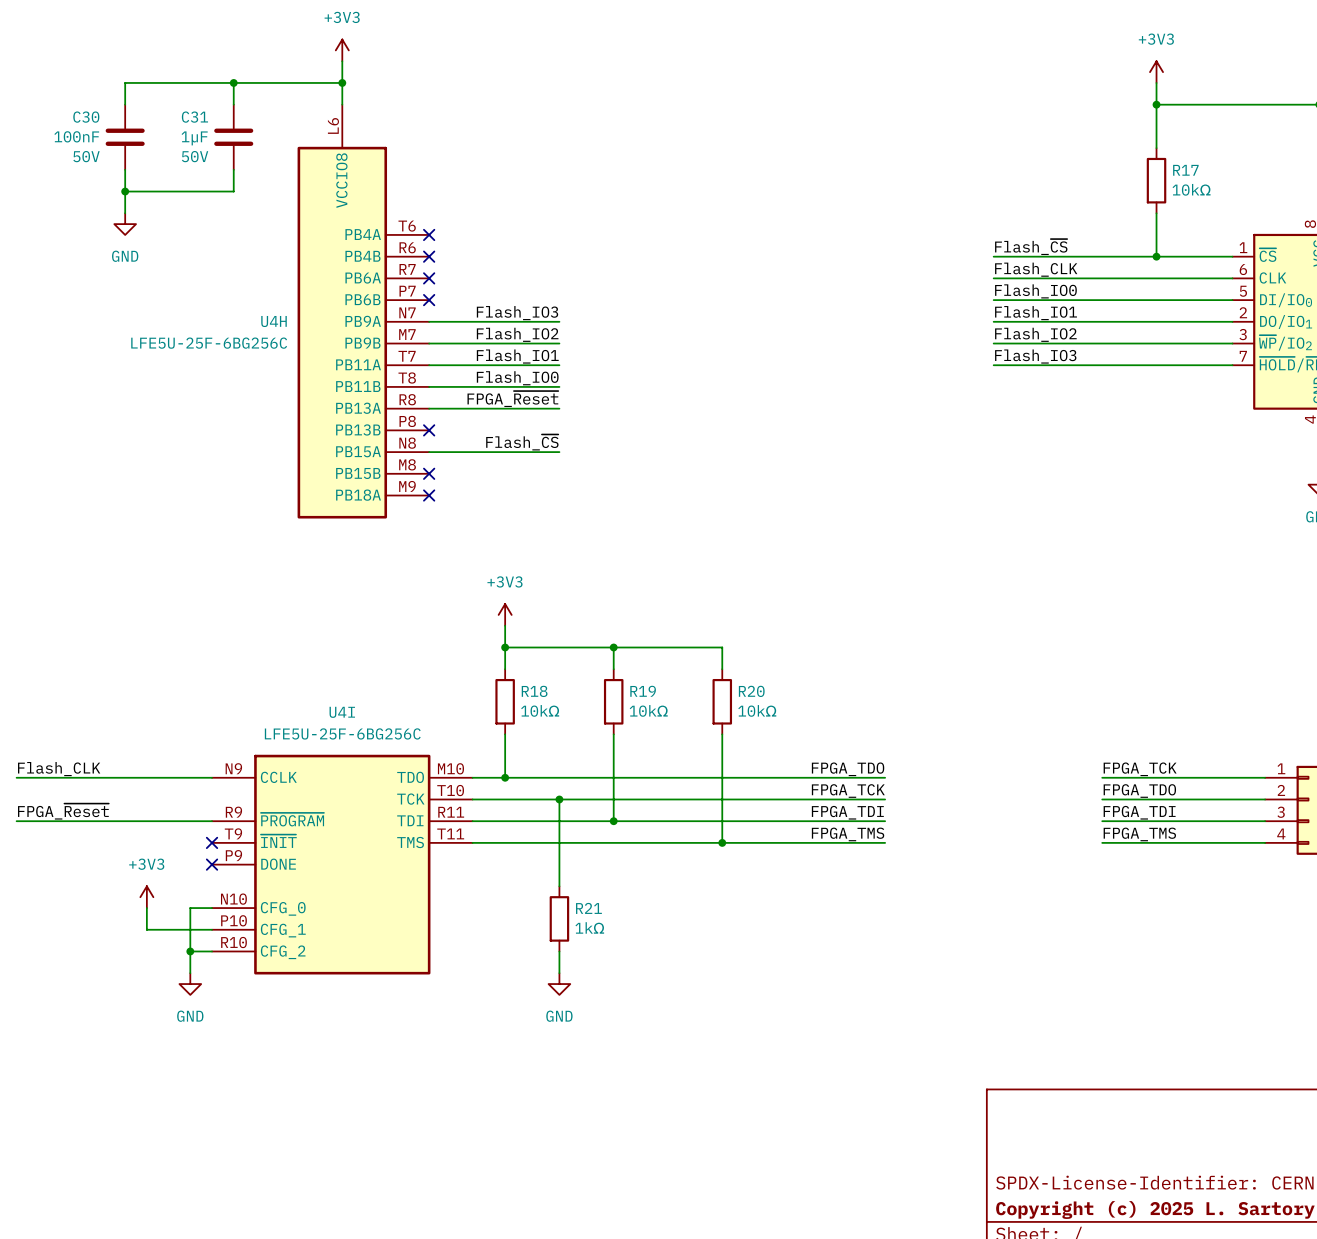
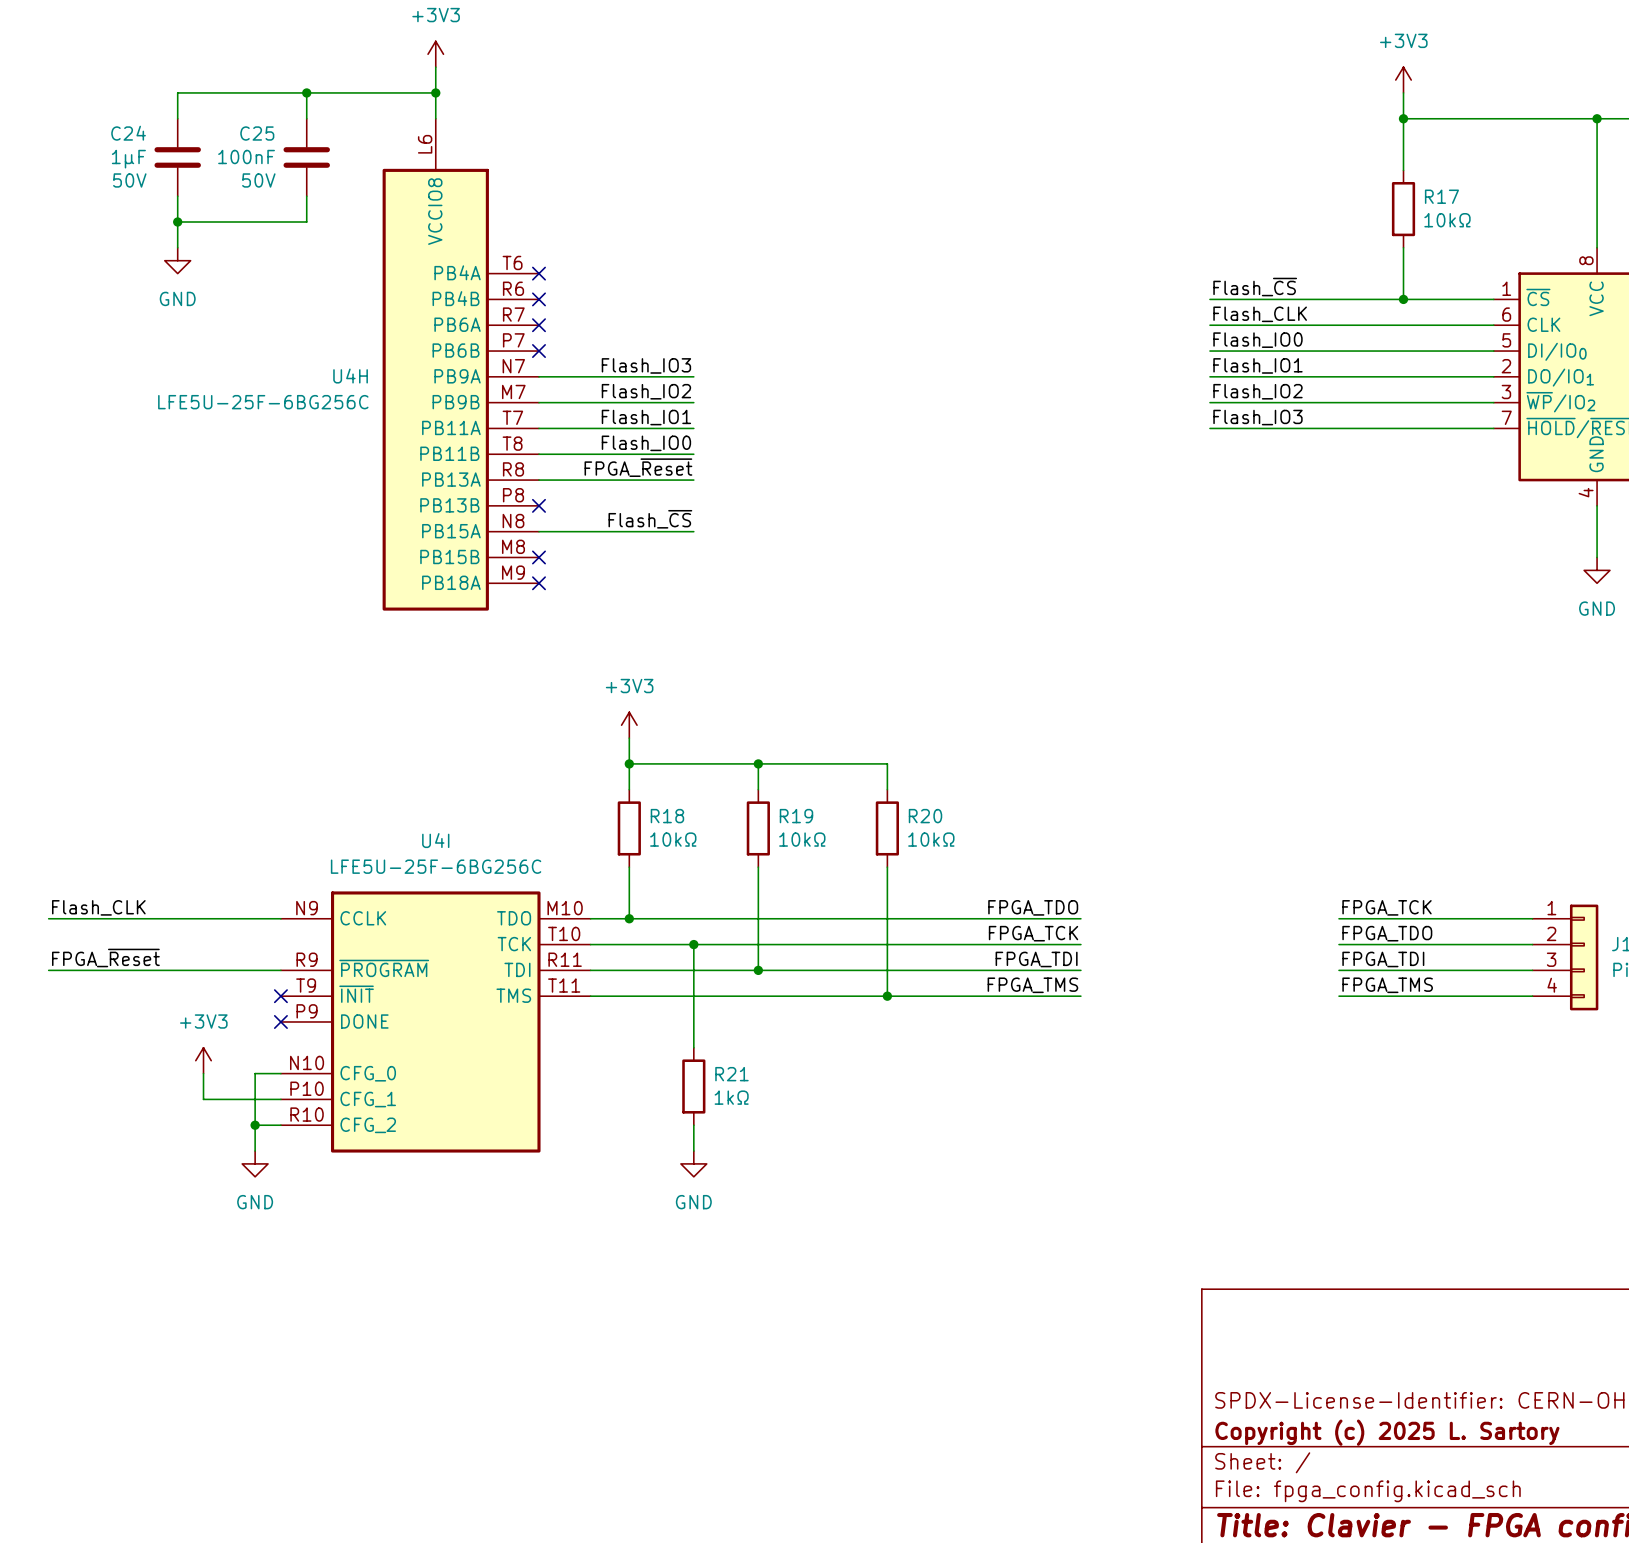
C30 name: C30 (86, 117) -> C24 (128, 133)
C31 name: C31 (194, 117) -> C25 (257, 133)
C30 value: 100nF (76, 136) -> 1µF (128, 159)
C31 value: 1µF (194, 138) -> 100nF (246, 157)

